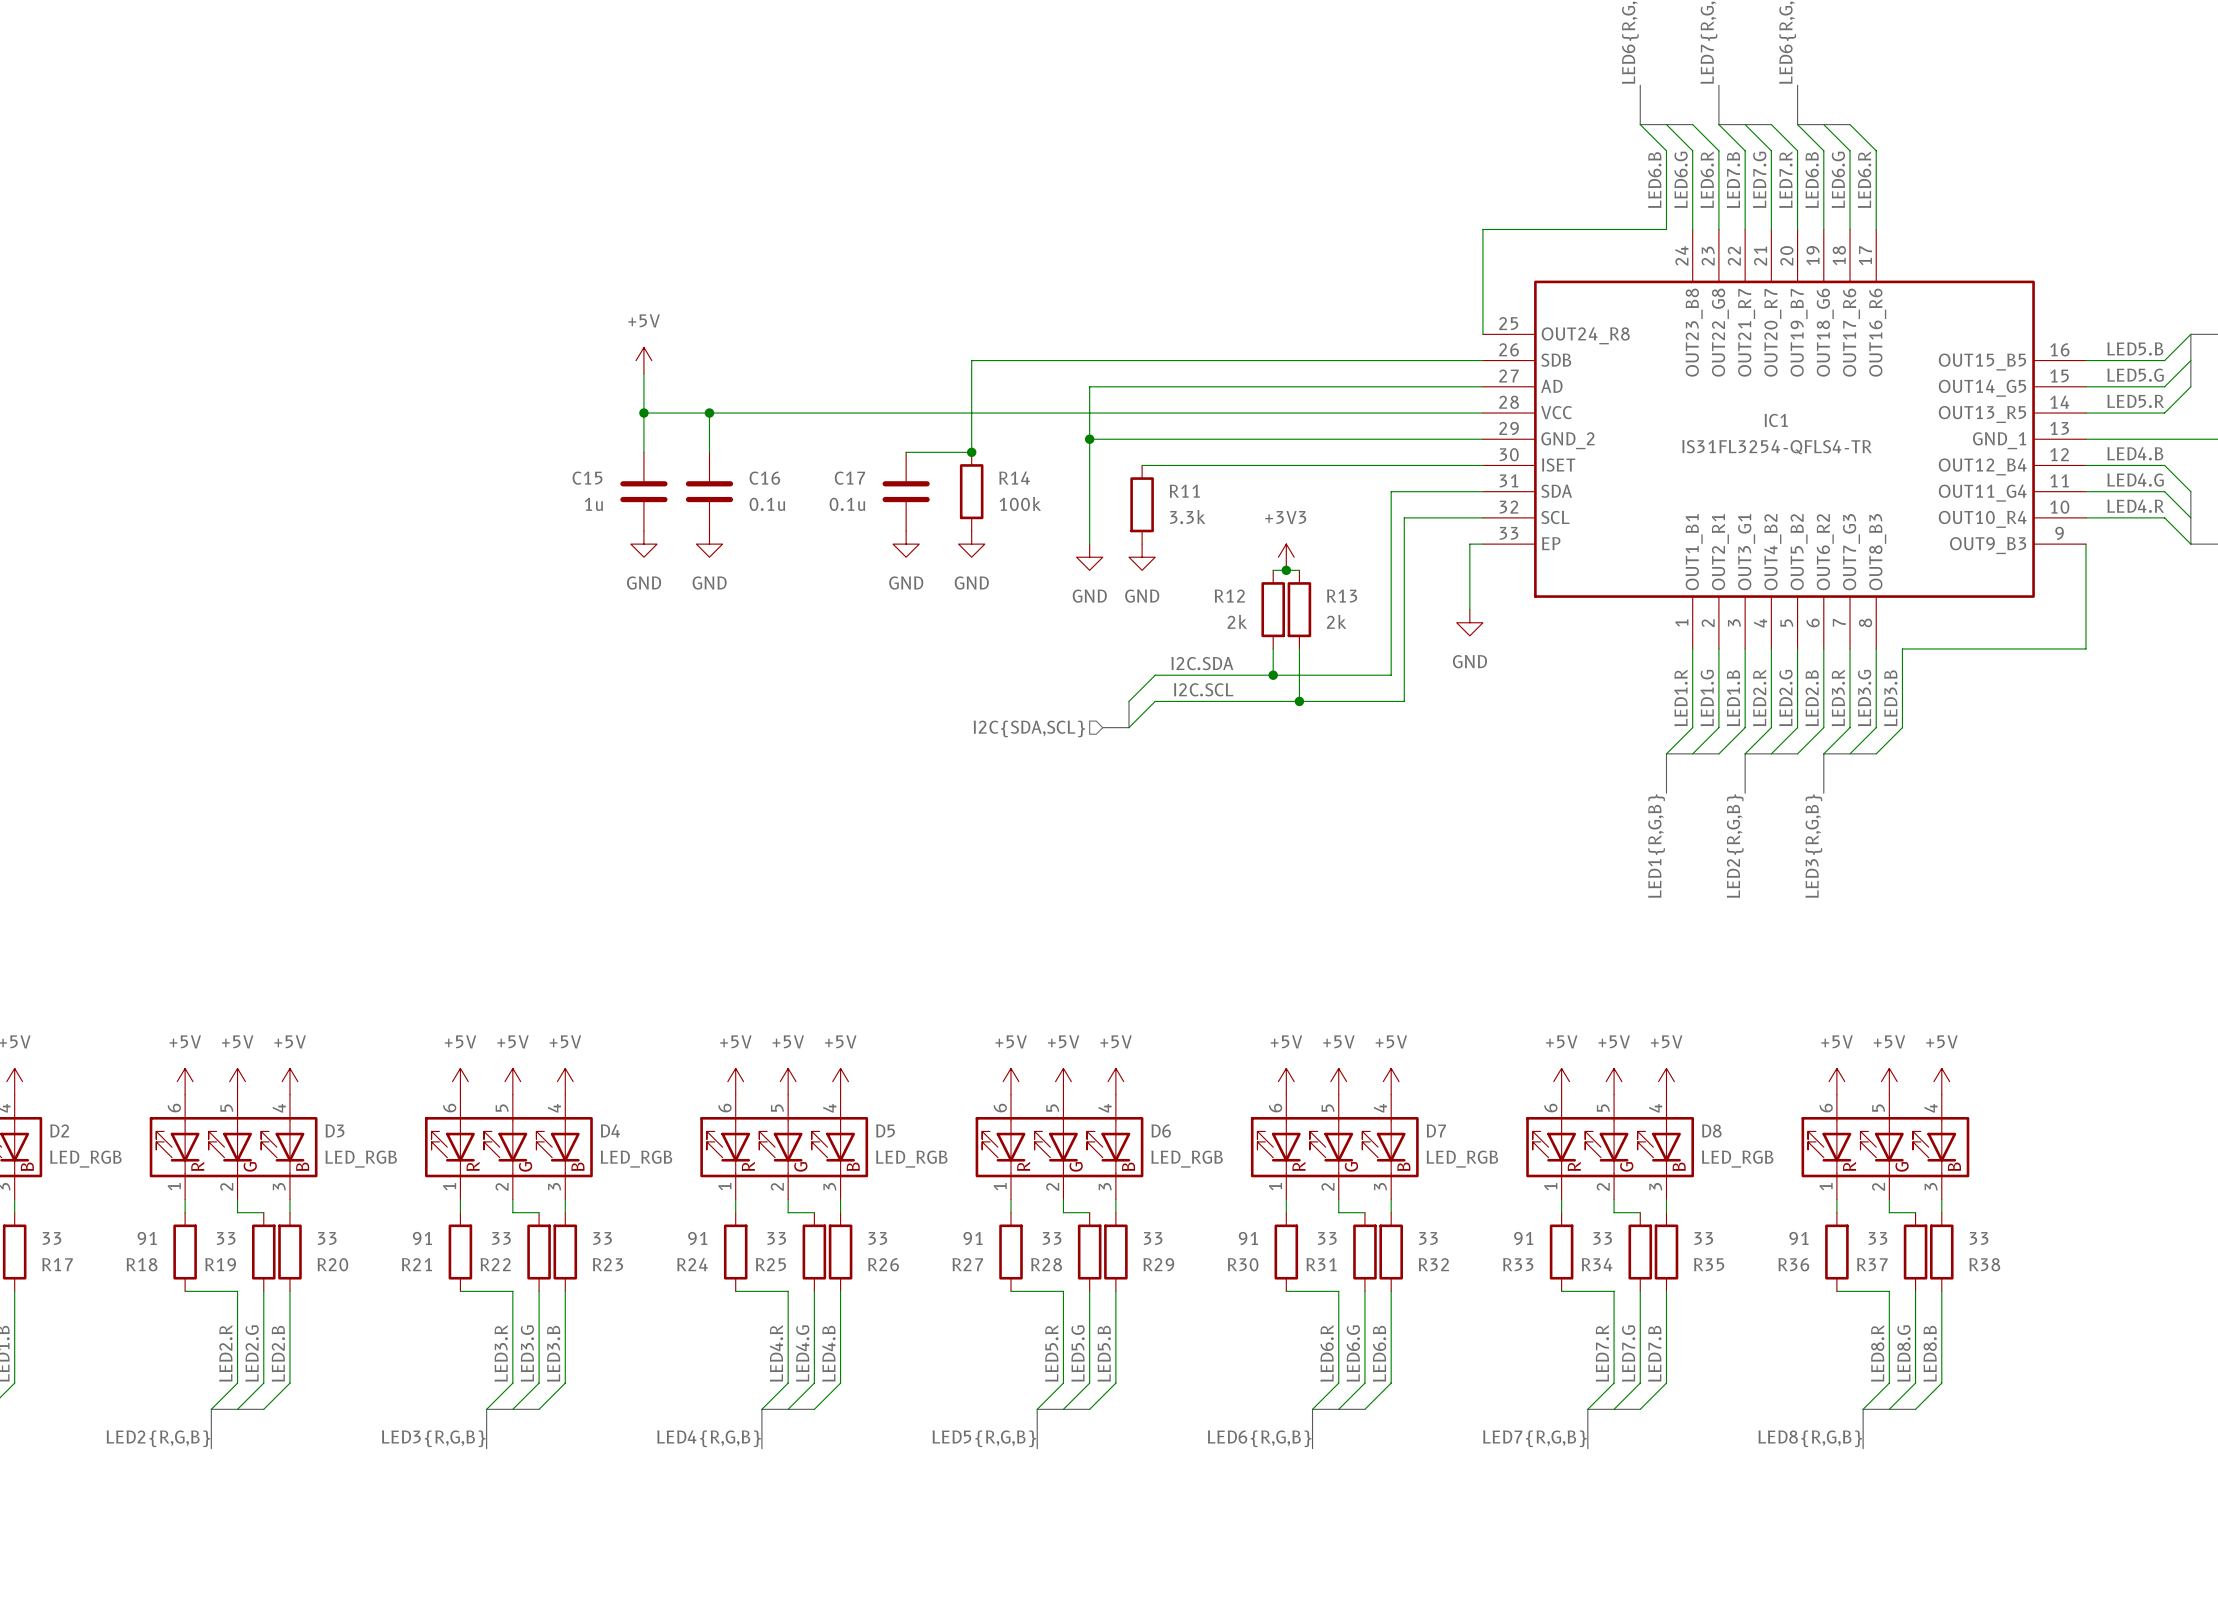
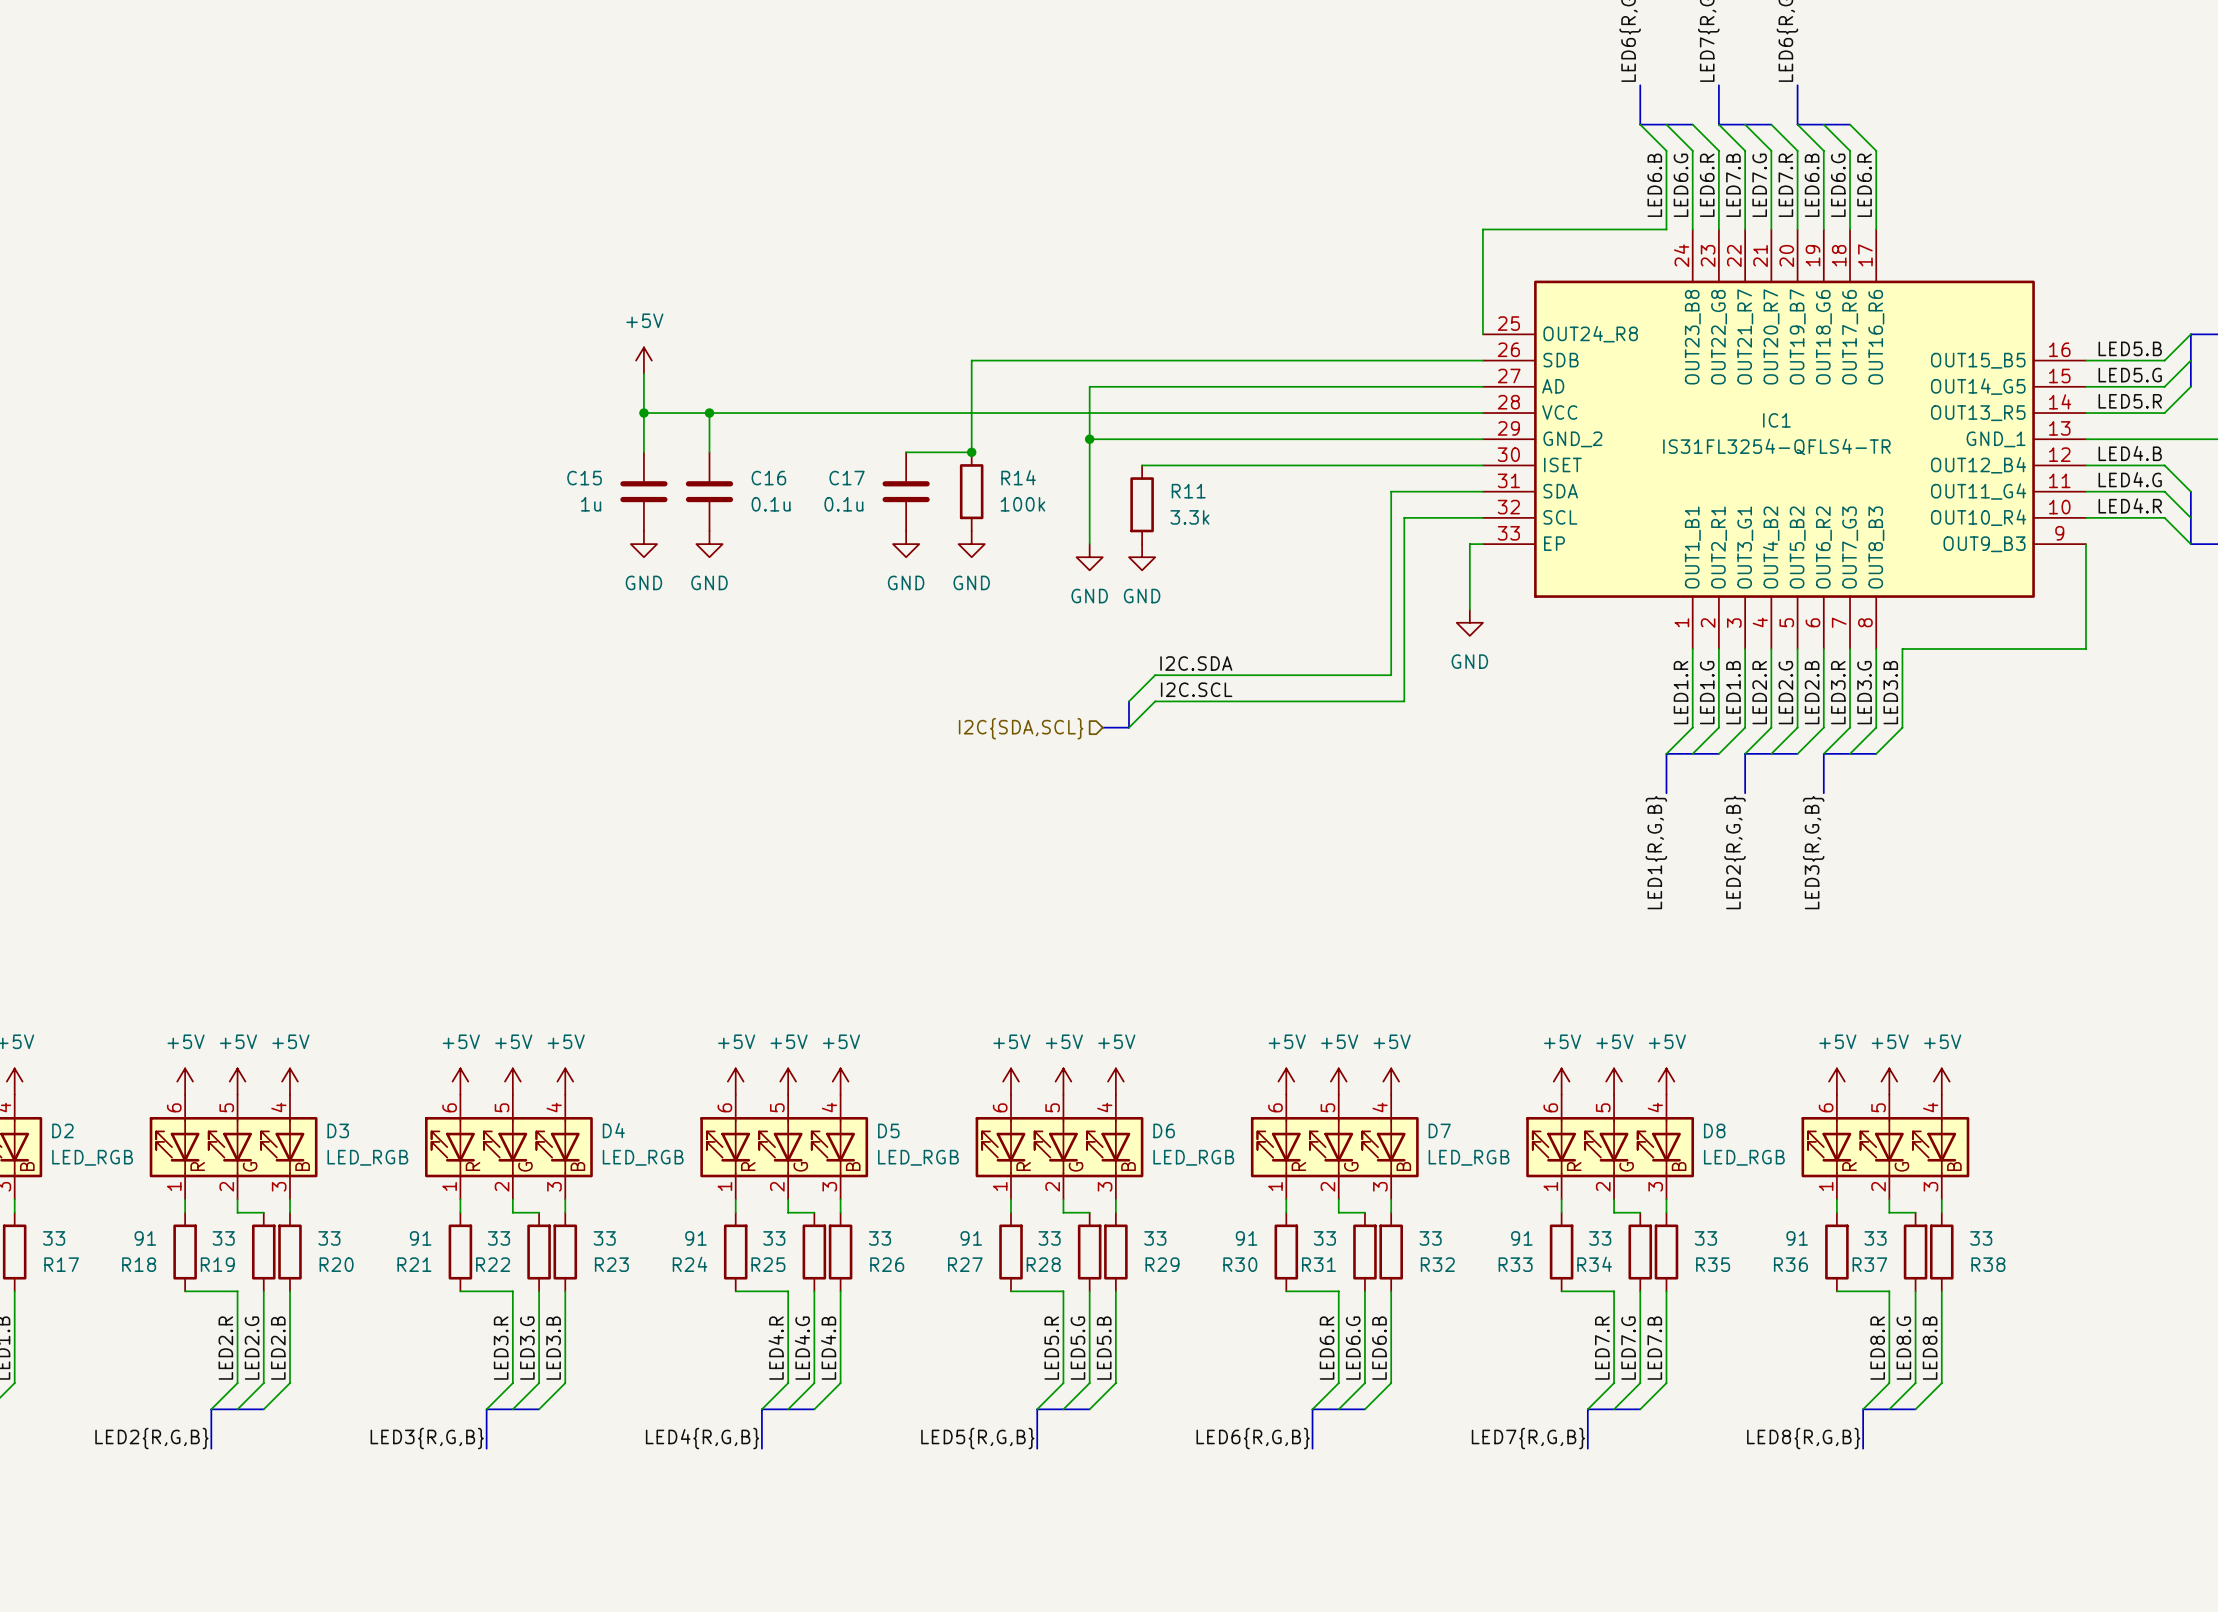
power symbol: +3V3 (1286, 557) -> none
wire: (1273, 570) (1299, 570) -> none
junction: (1286, 570) -> none
R12: 2k (1273, 609) -> none
R13: 2k (1299, 609) -> none
wire: (1273, 648) (1273, 675) -> none
wire: (1299, 648) (1299, 701) -> none
junction: (1273, 675) -> none
junction: (1299, 701) -> none

